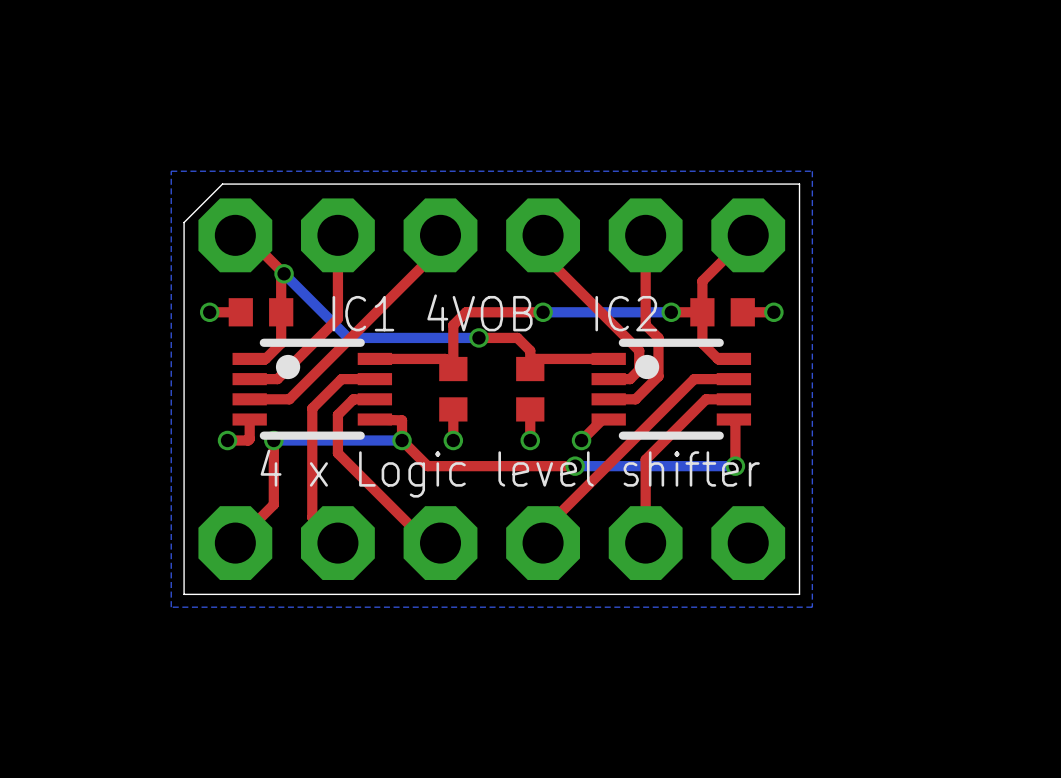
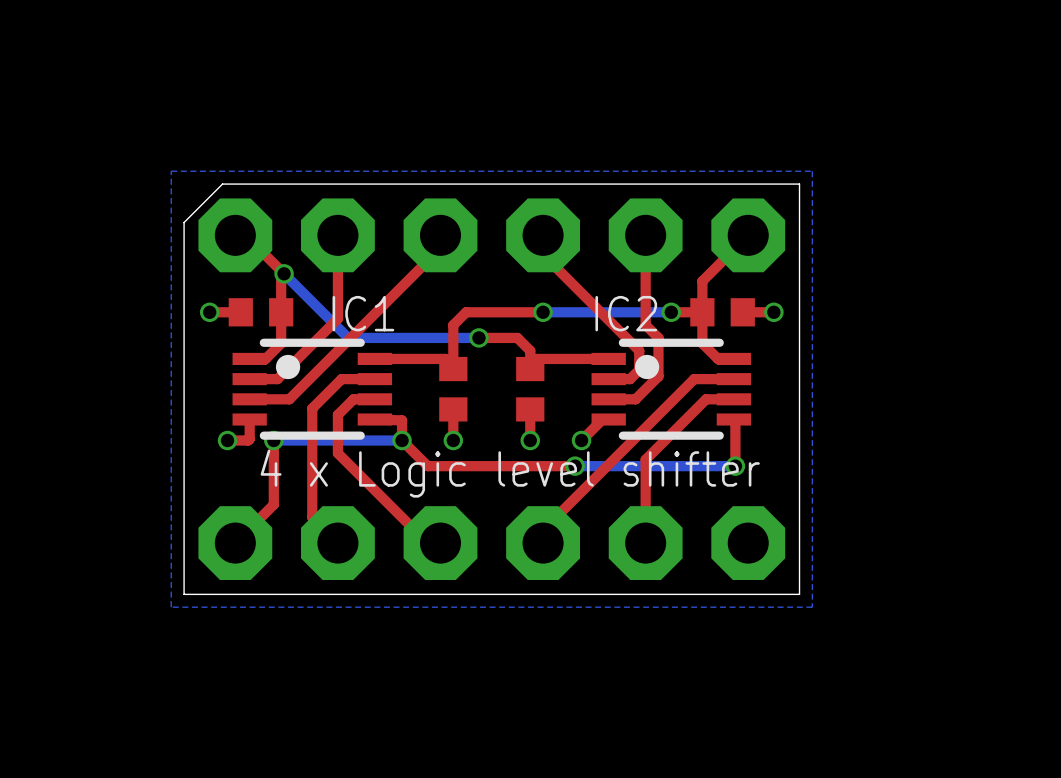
text: 4VOB (479, 312) -> none

